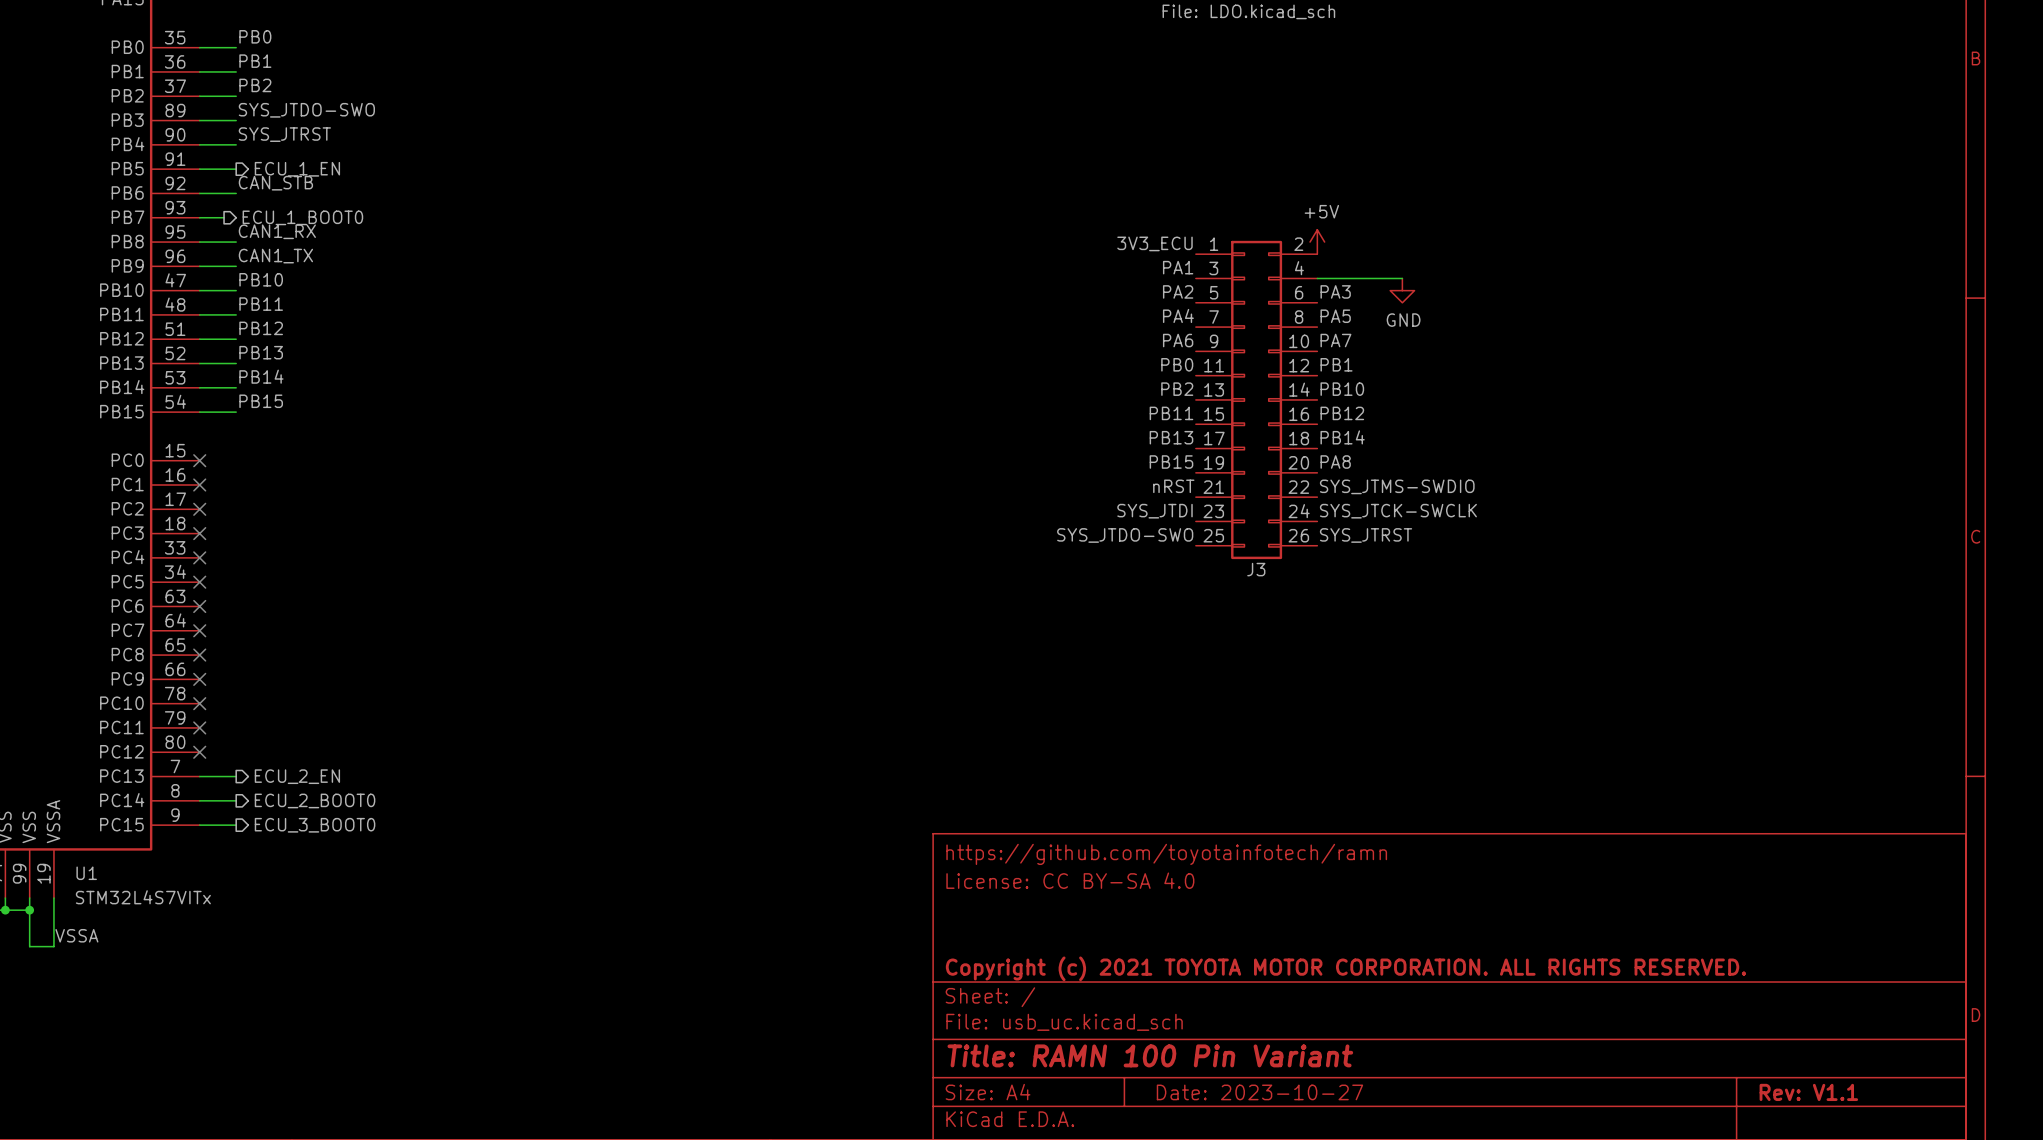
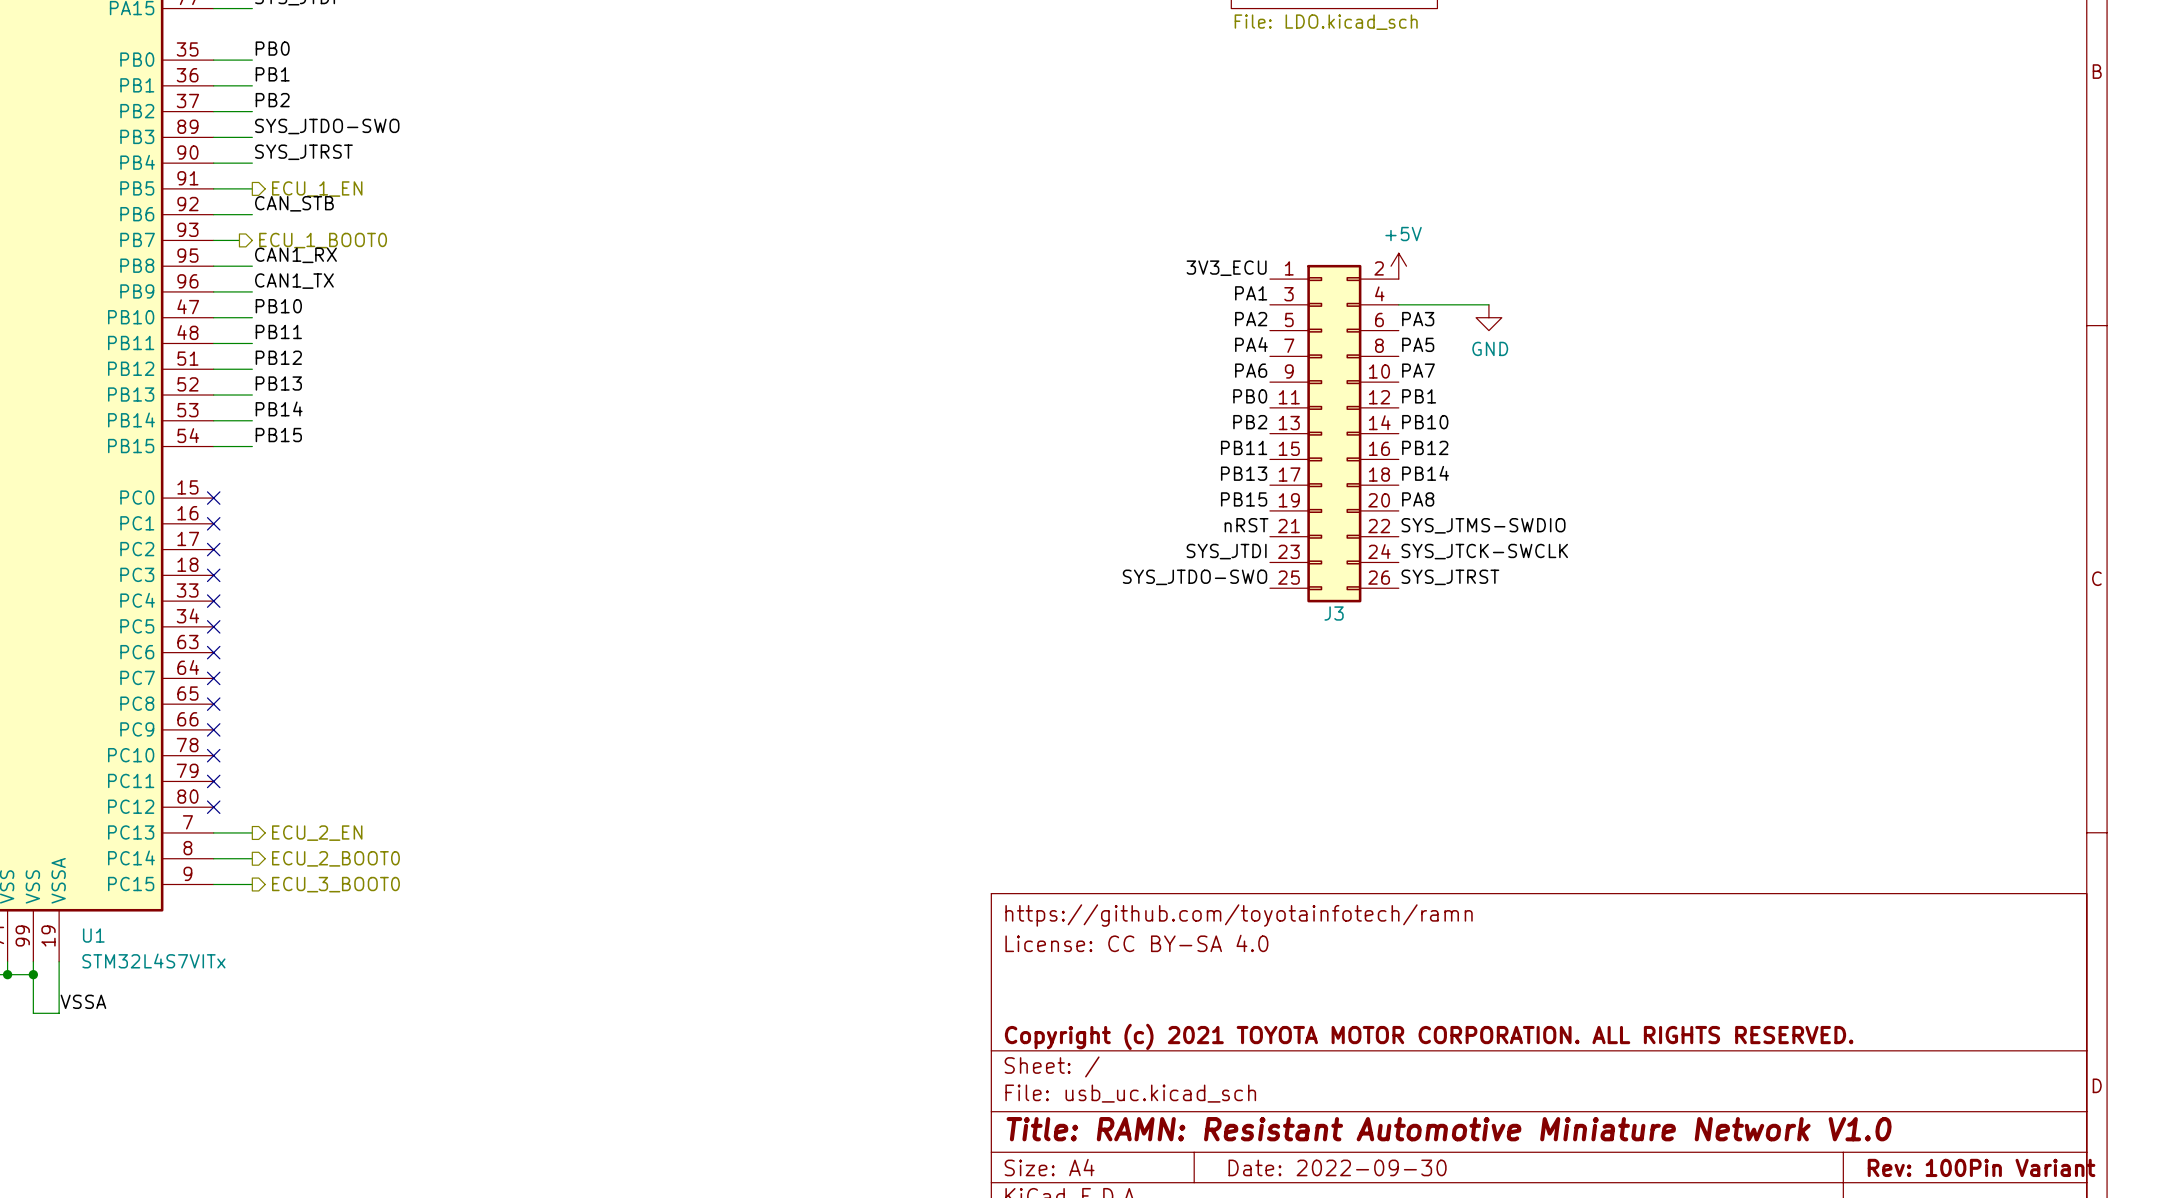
title block: Title: RAMN 100 Pin Variant (1150, 1055) -> Title: RAMN: Resistant Automotive Miniature Network V1.0 (1449, 1129)
title block: Date: 2023-10-27 (1259, 1092) -> Date: 2022-09-30 (1337, 1167)
title block: Rev: V1.1 (1808, 1092) -> Rev: 100Pin Variant (1981, 1167)

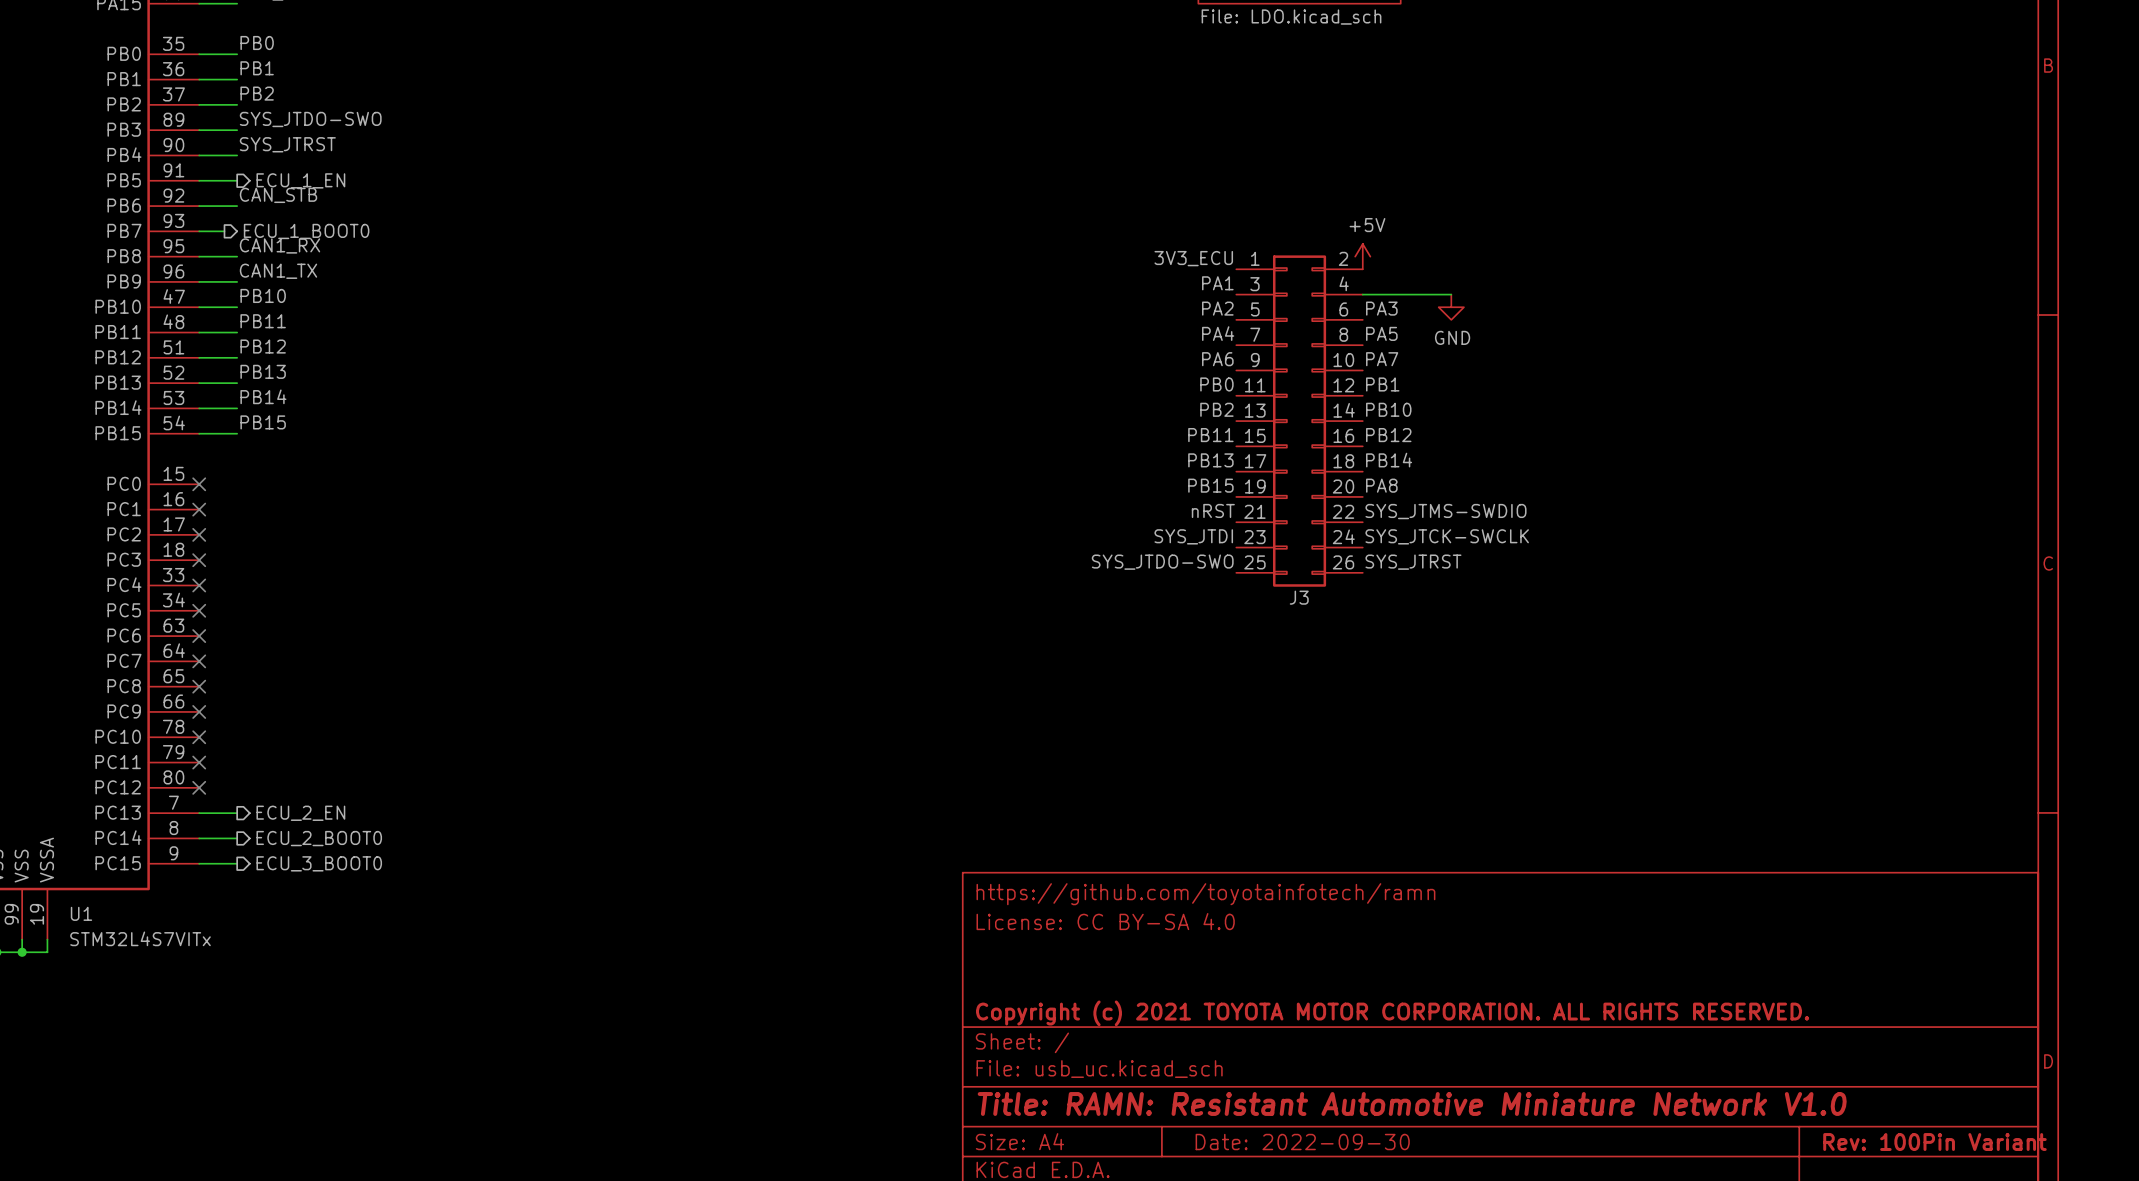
wire: (33, 974) (33, 1013) (59, 1013) (59, 974) -> (22, 952) (47, 952)
label: VSSA (83, 1001) -> none

